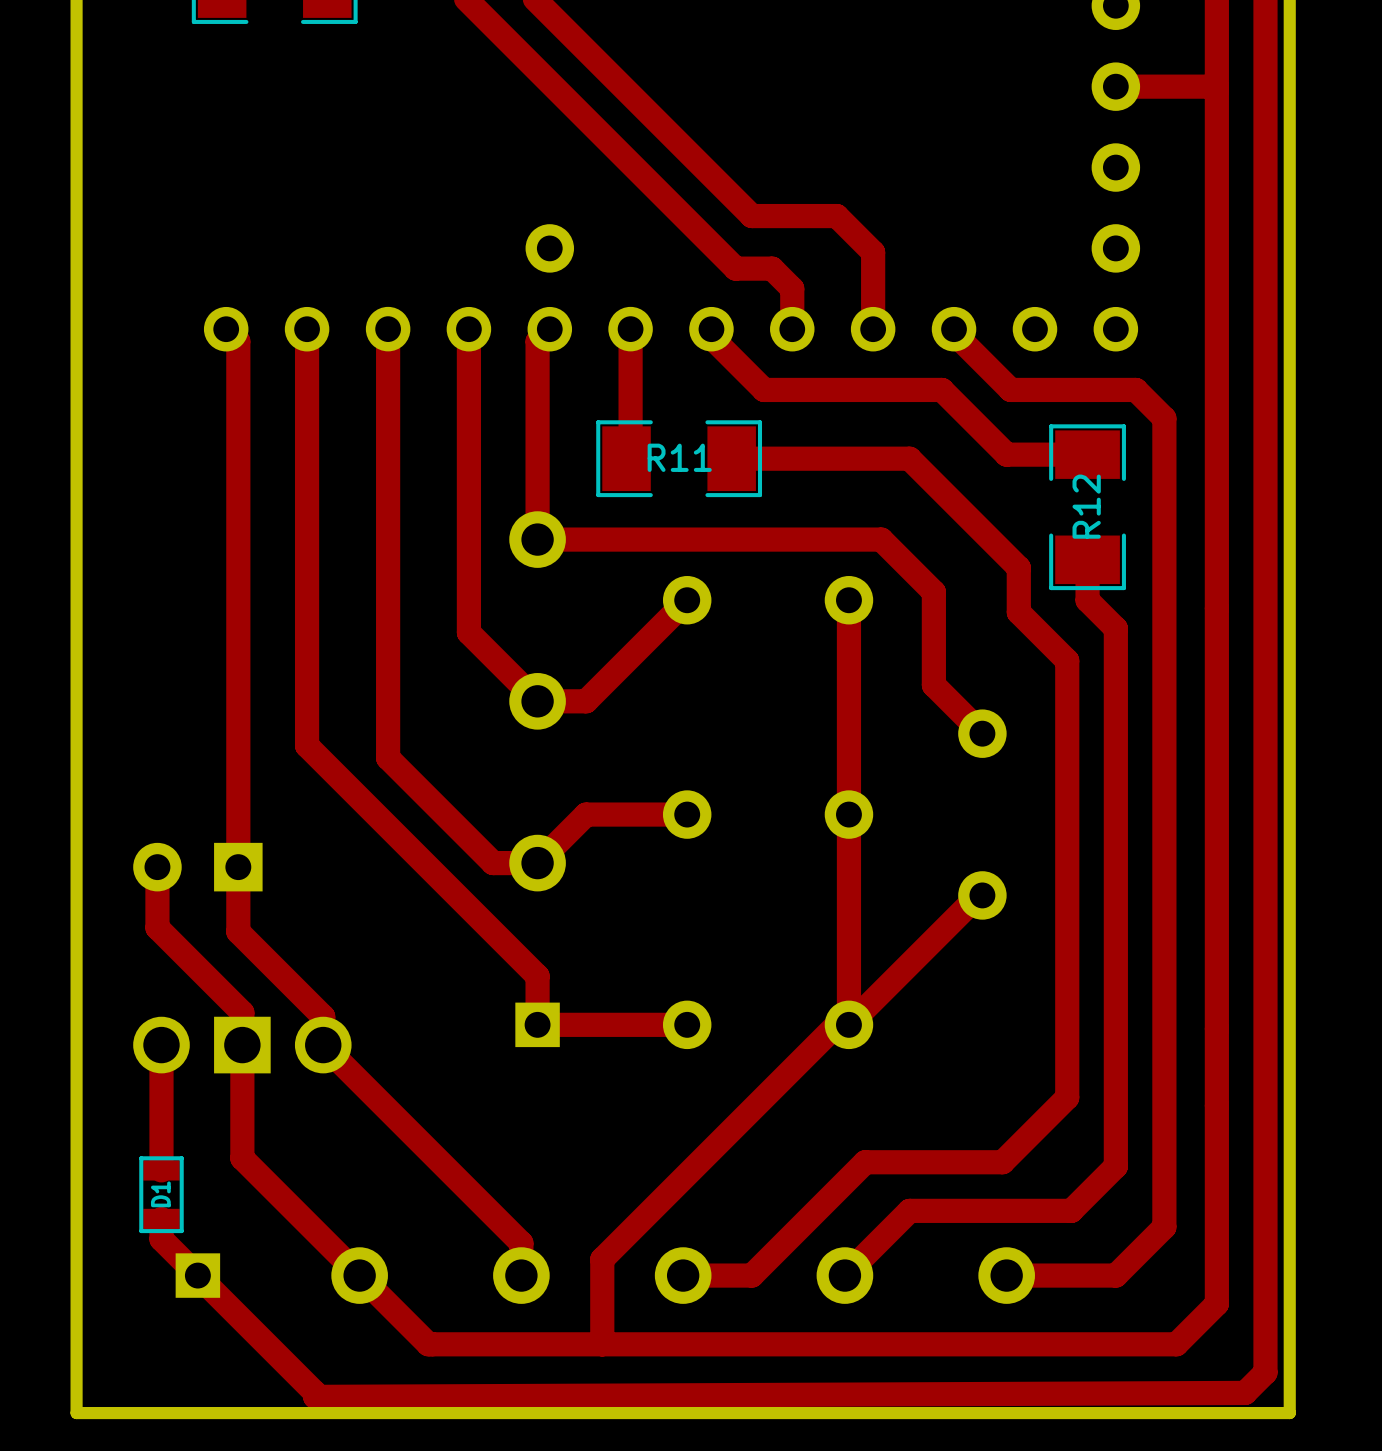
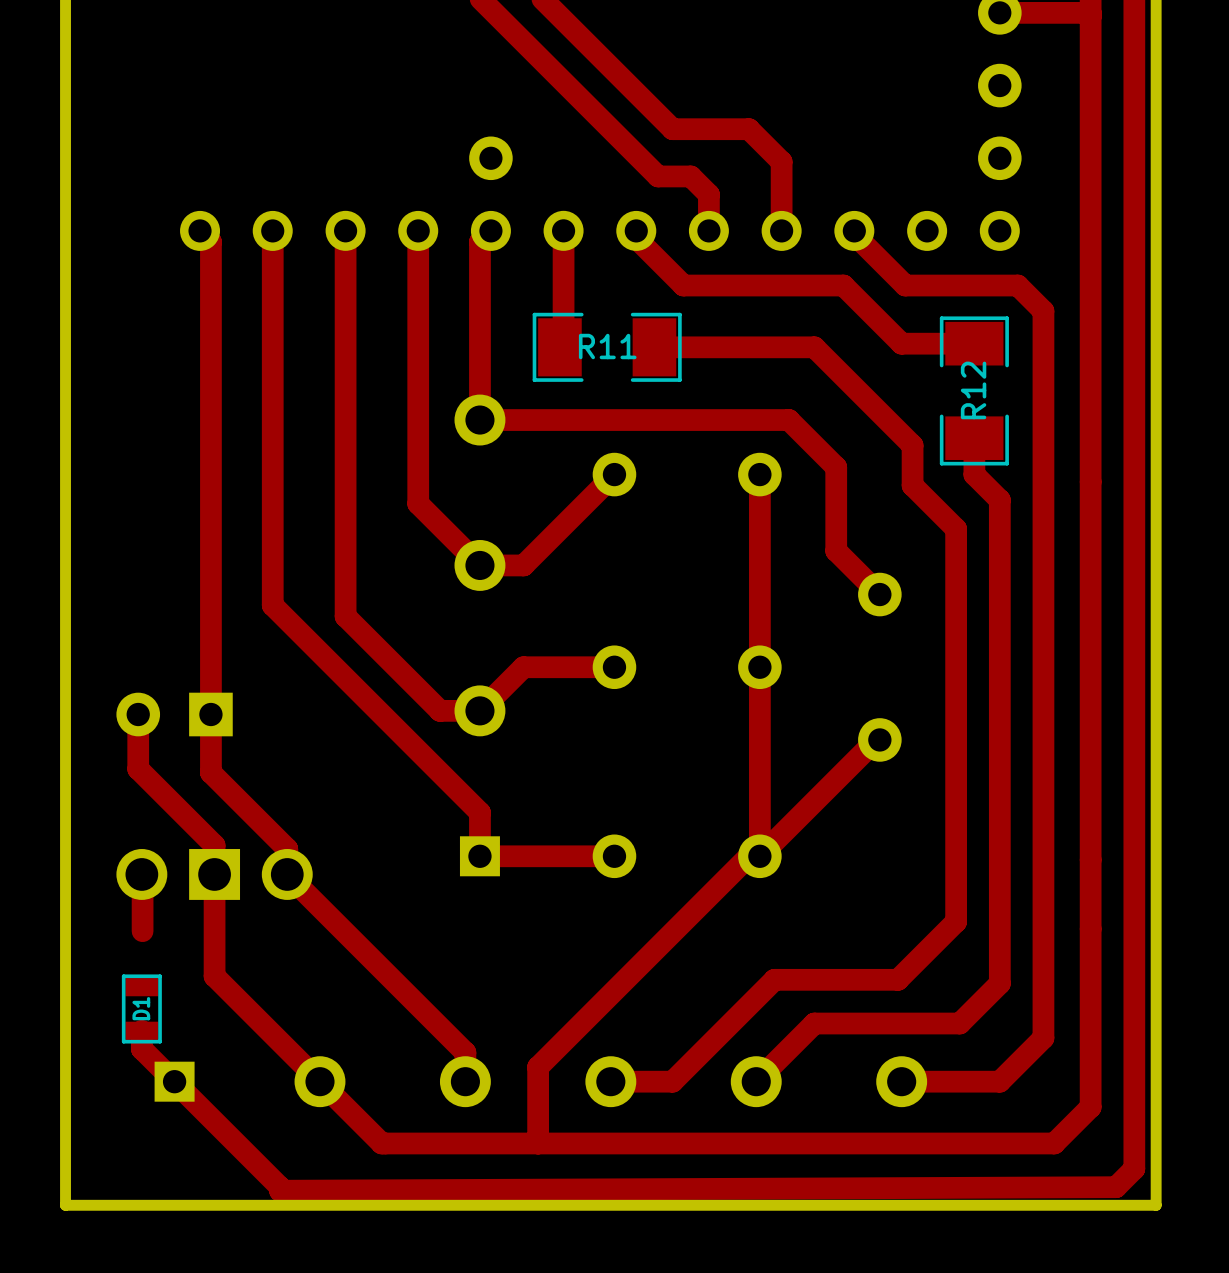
top track: (161, 1045) (161, 1170) -> (141, 874) (142, 931)

